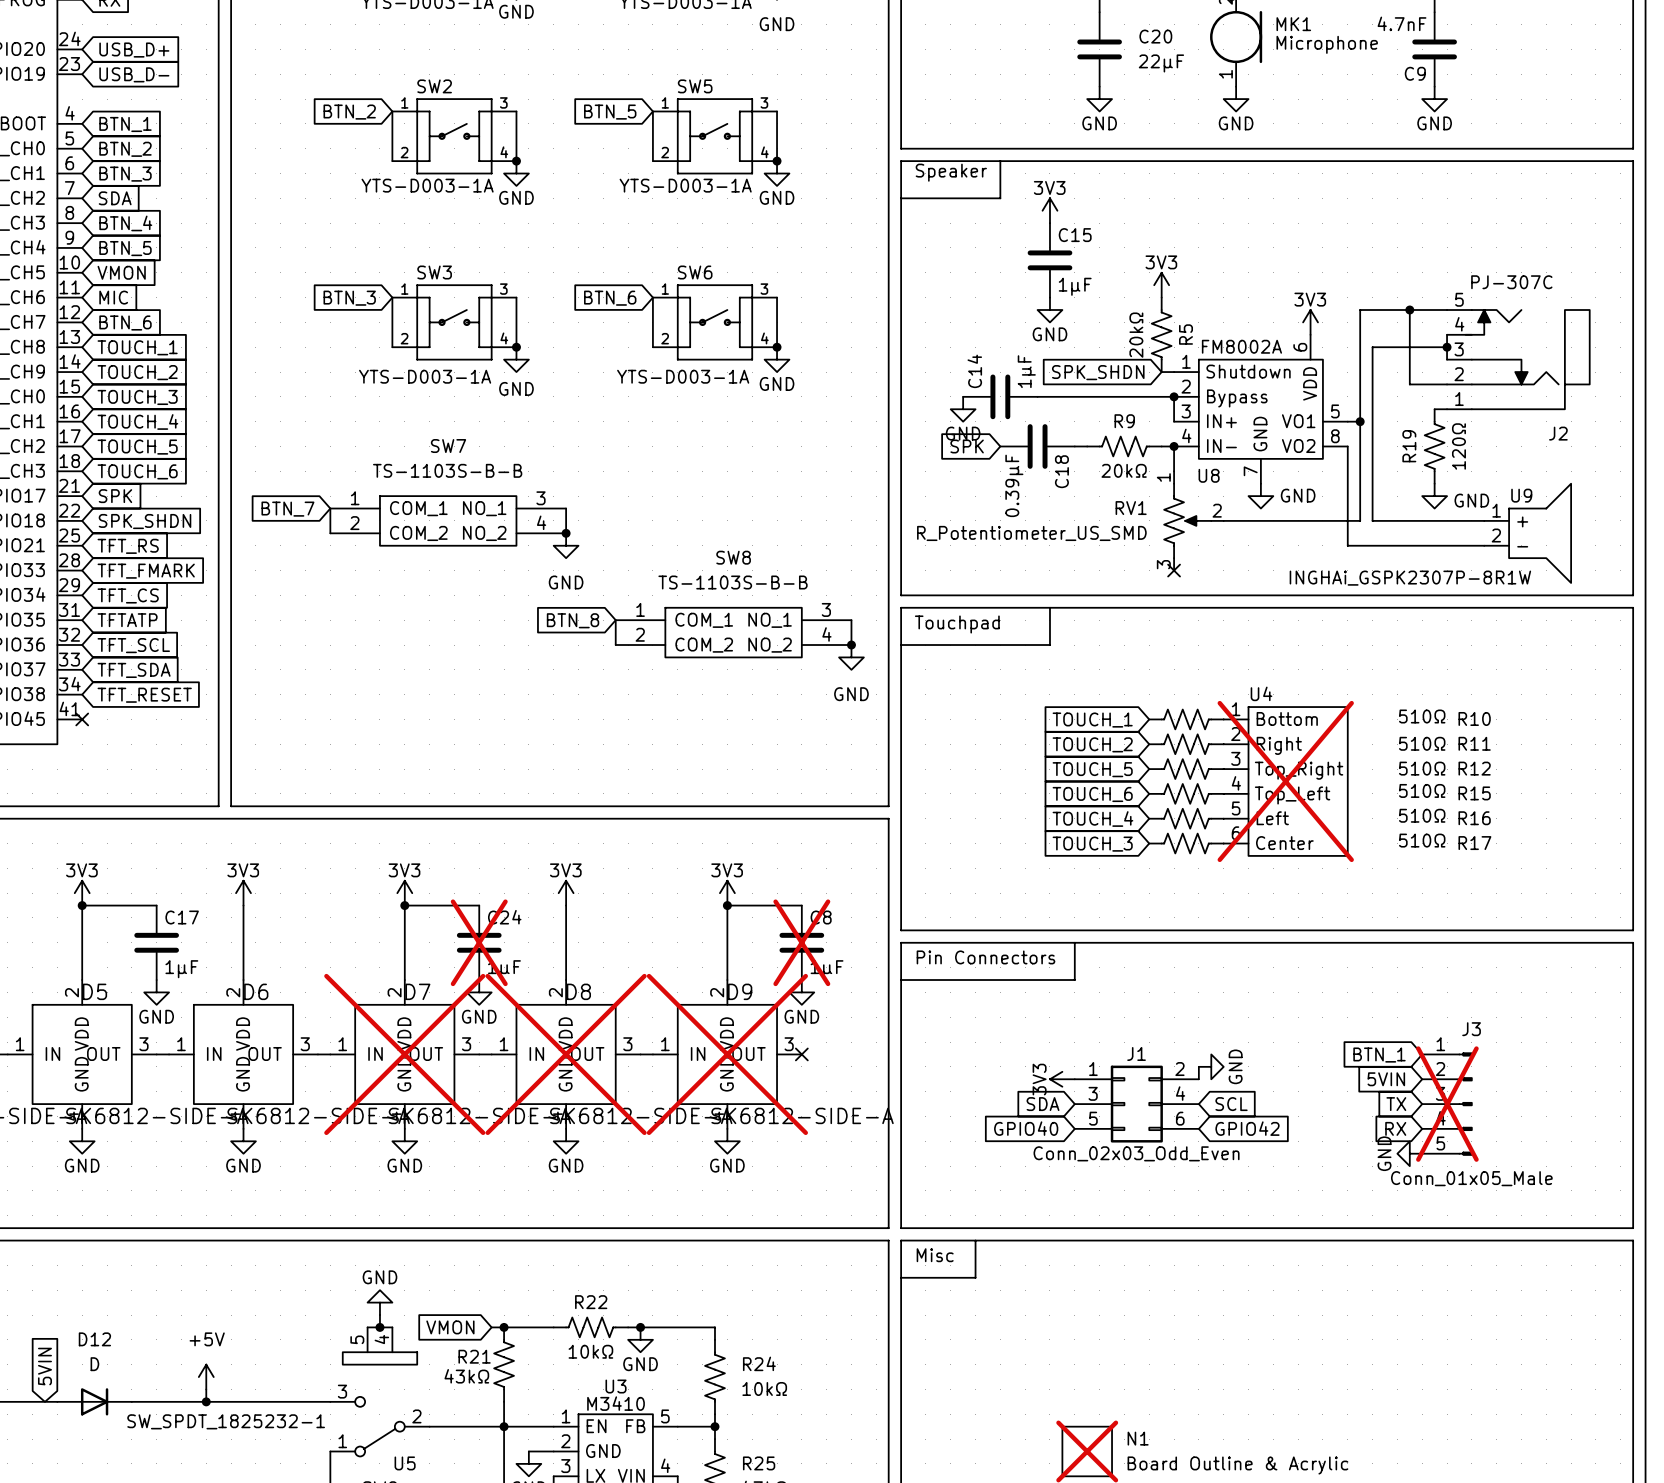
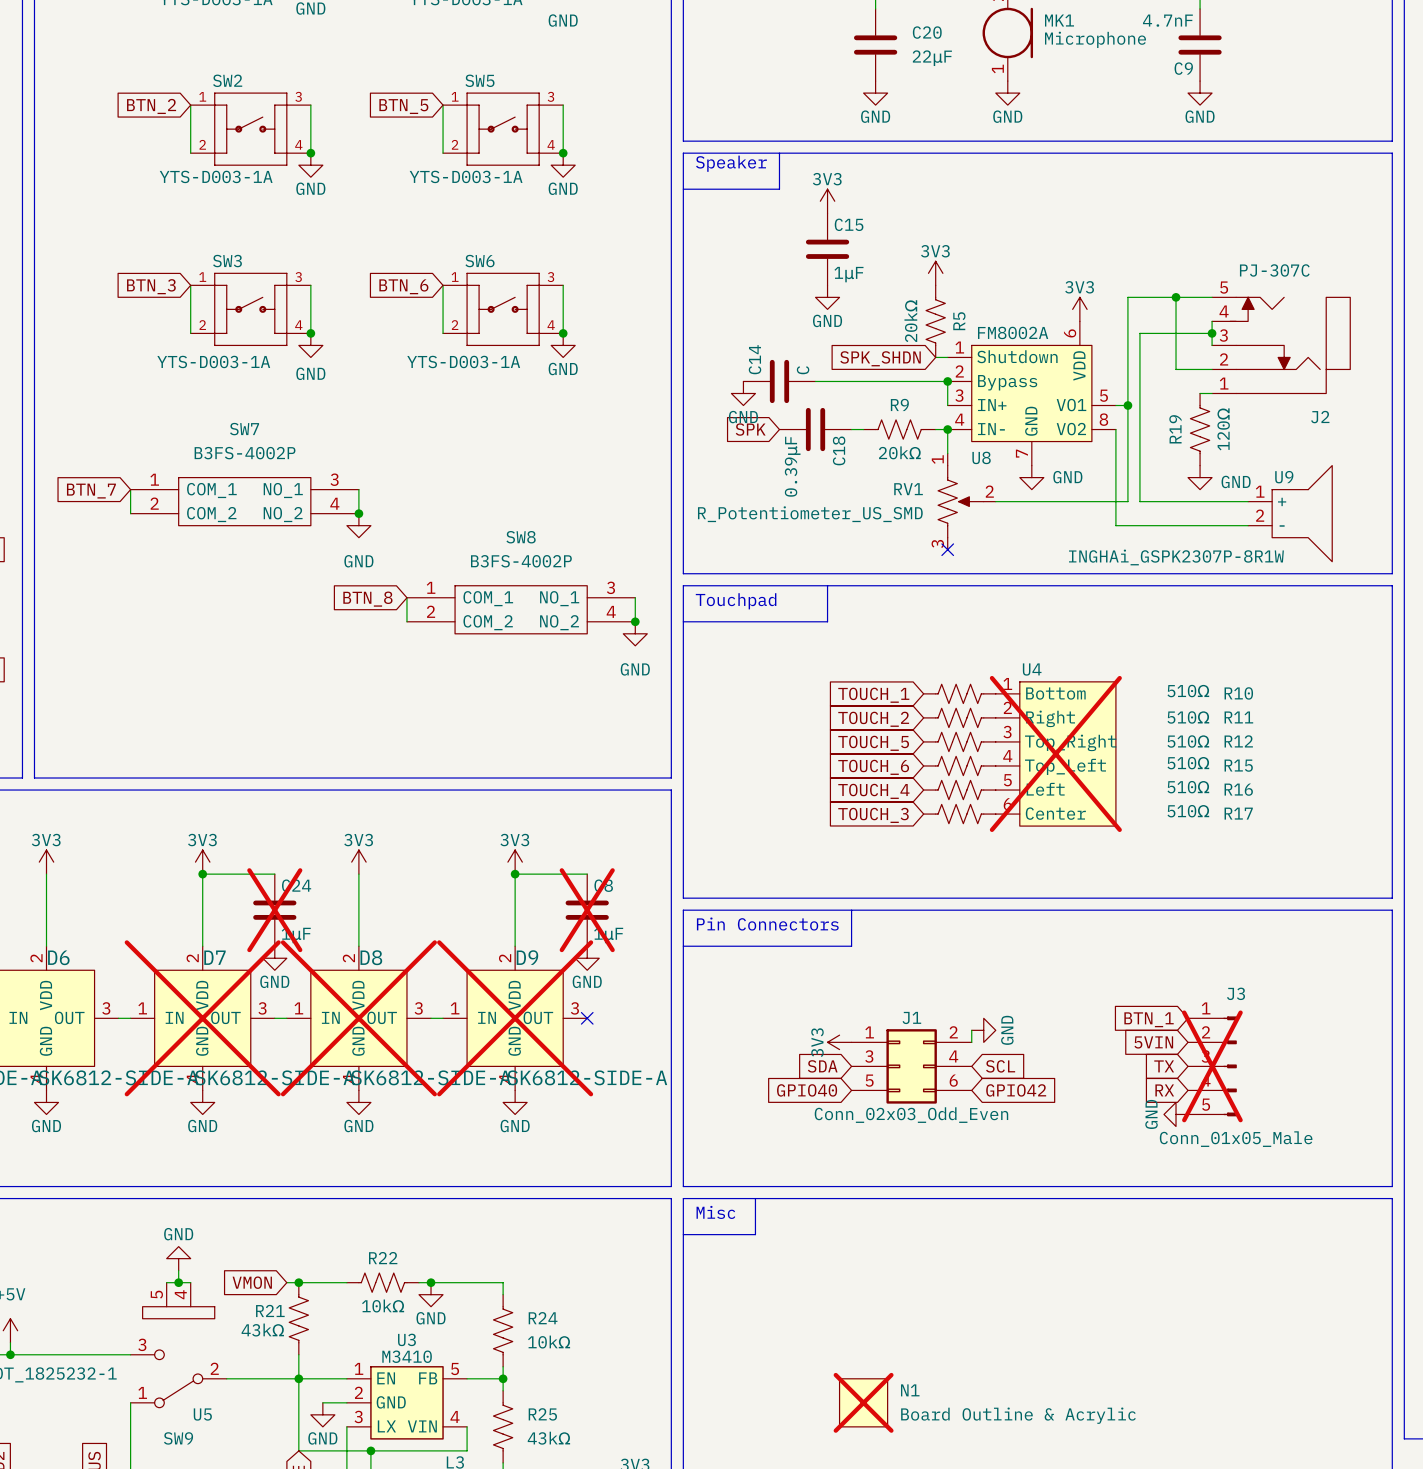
C14 value: 1μF (1026, 371) -> C (803, 370)
SW7 value: TS-1103S-B-B (447, 470) -> B3FS-4002P (245, 453)
SW8 value: TS-1103S-B-B (733, 582) -> B3FS-4002P (521, 561)

